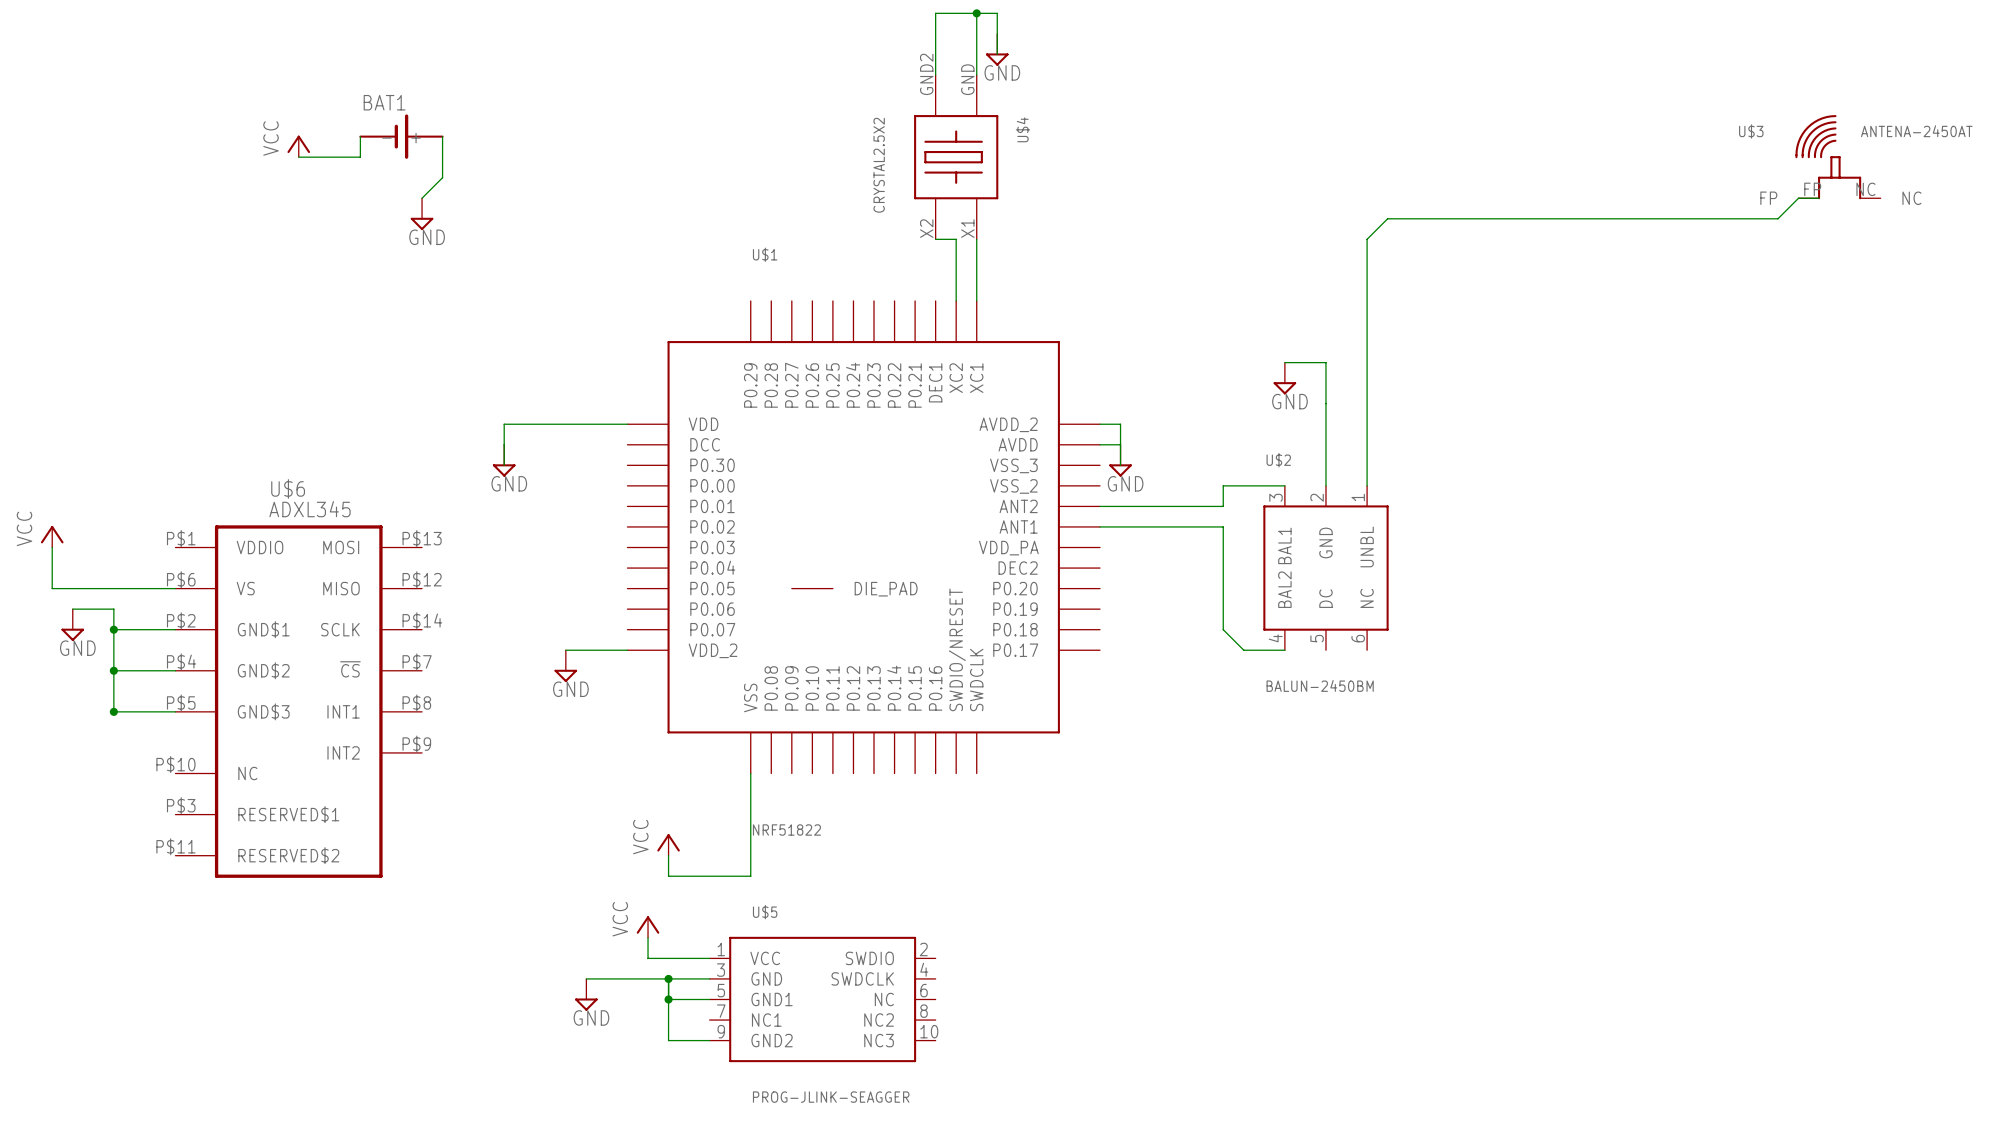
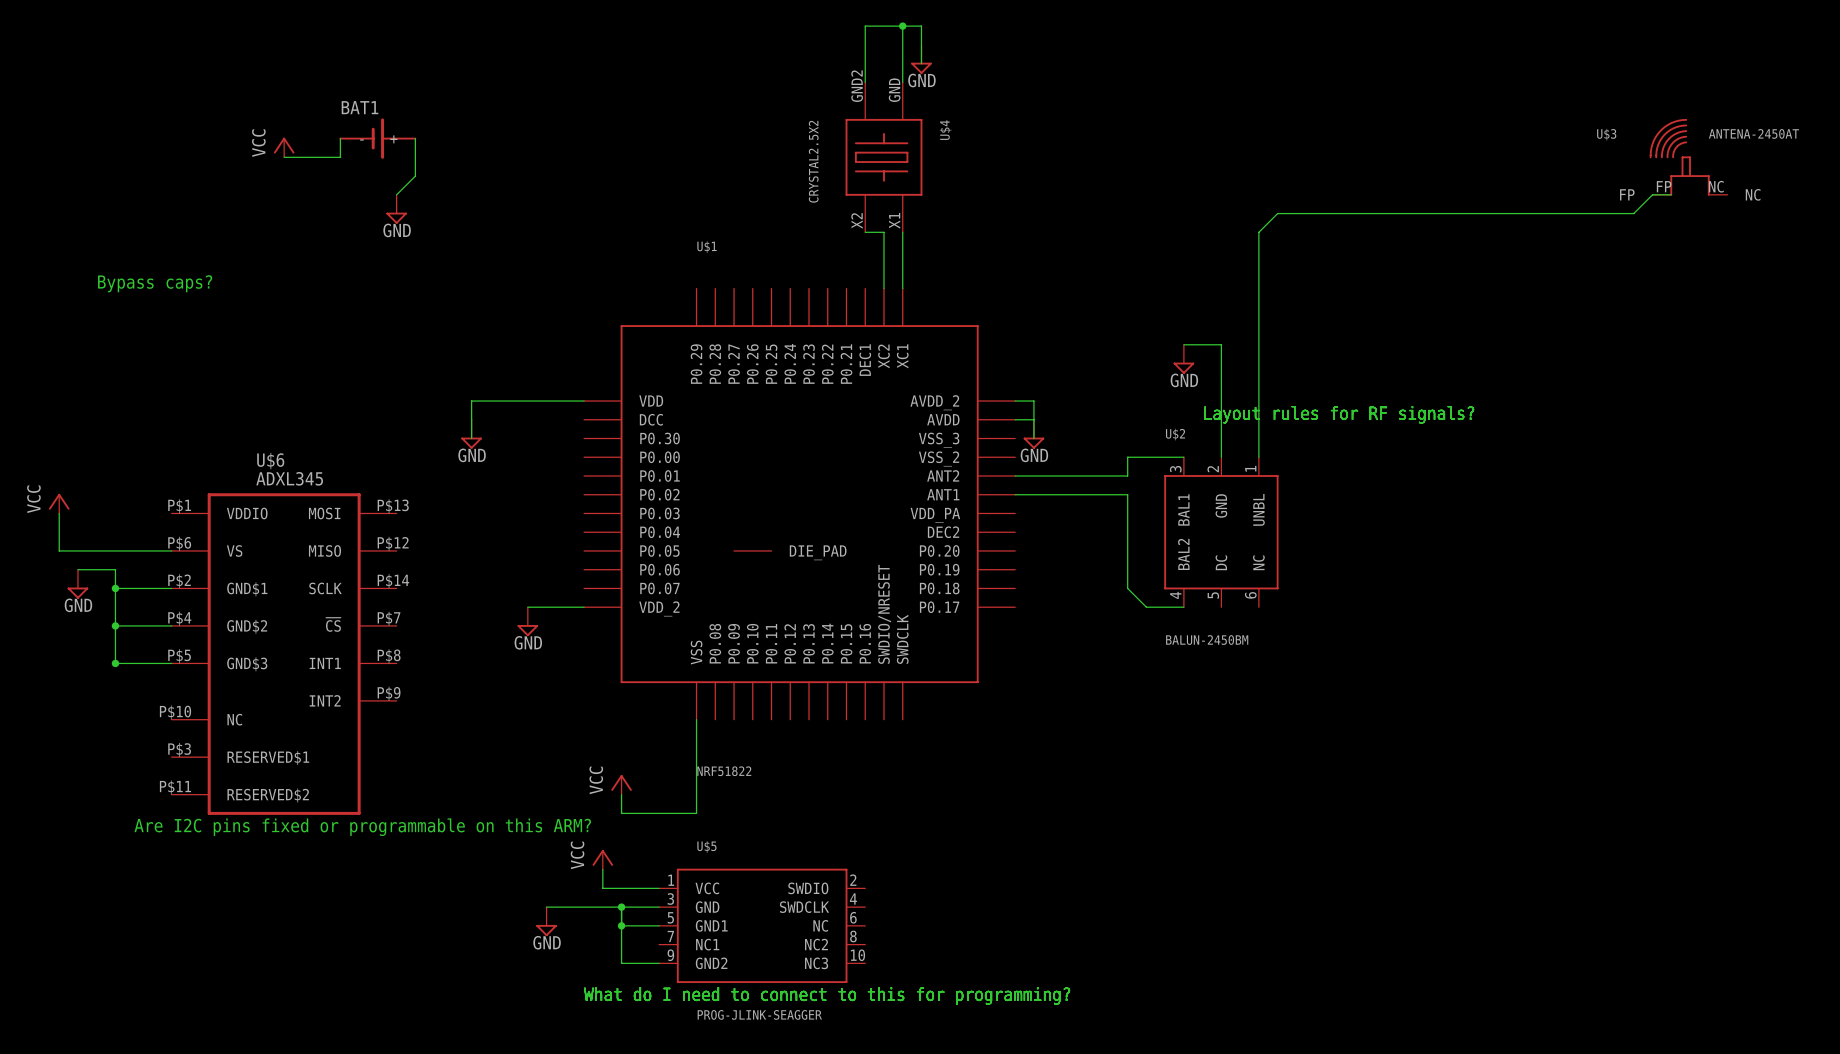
text: none -> Bypass caps? (155, 283)
text: none -> Layout rules for RF signals? (1339, 414)
text: none -> Are I2C pins fixed or programmable on this ARM? (362, 827)
text: none -> What do I need to connect to this for programming? (827, 995)

